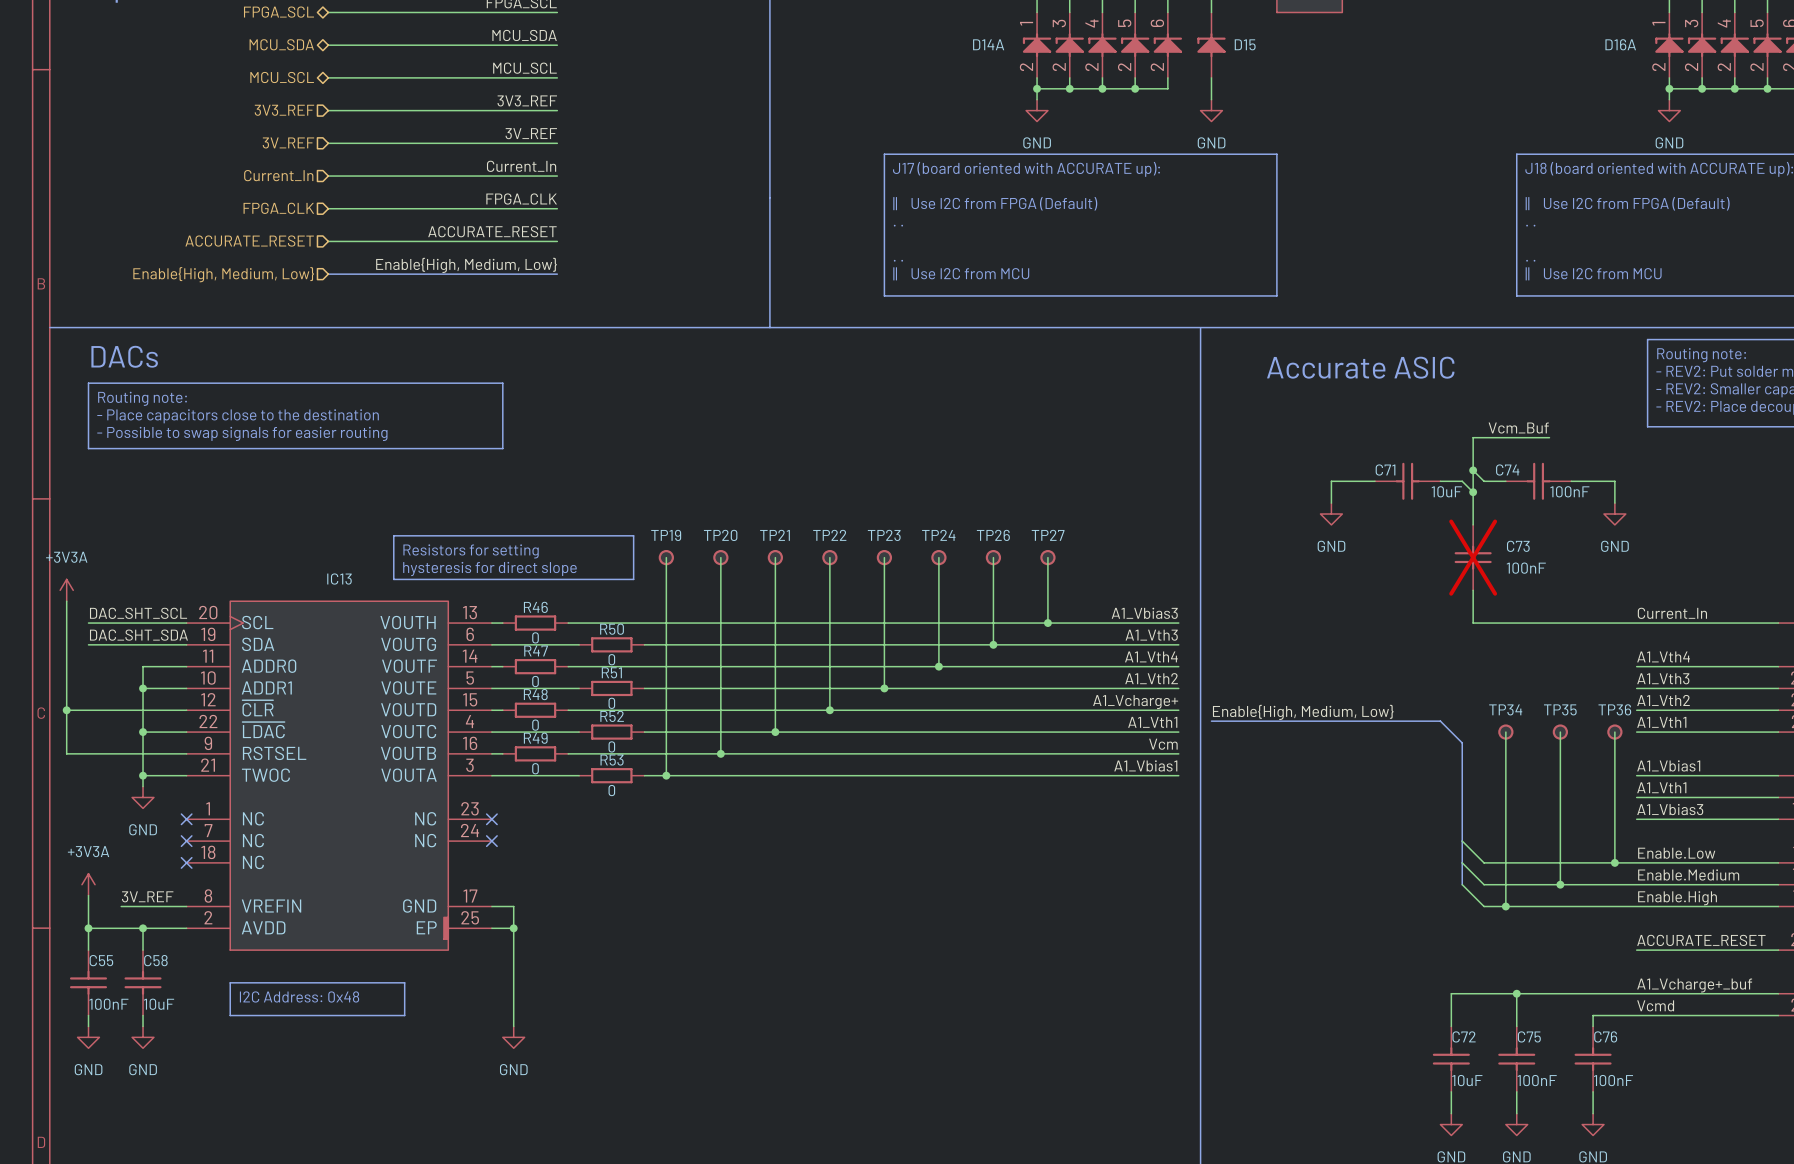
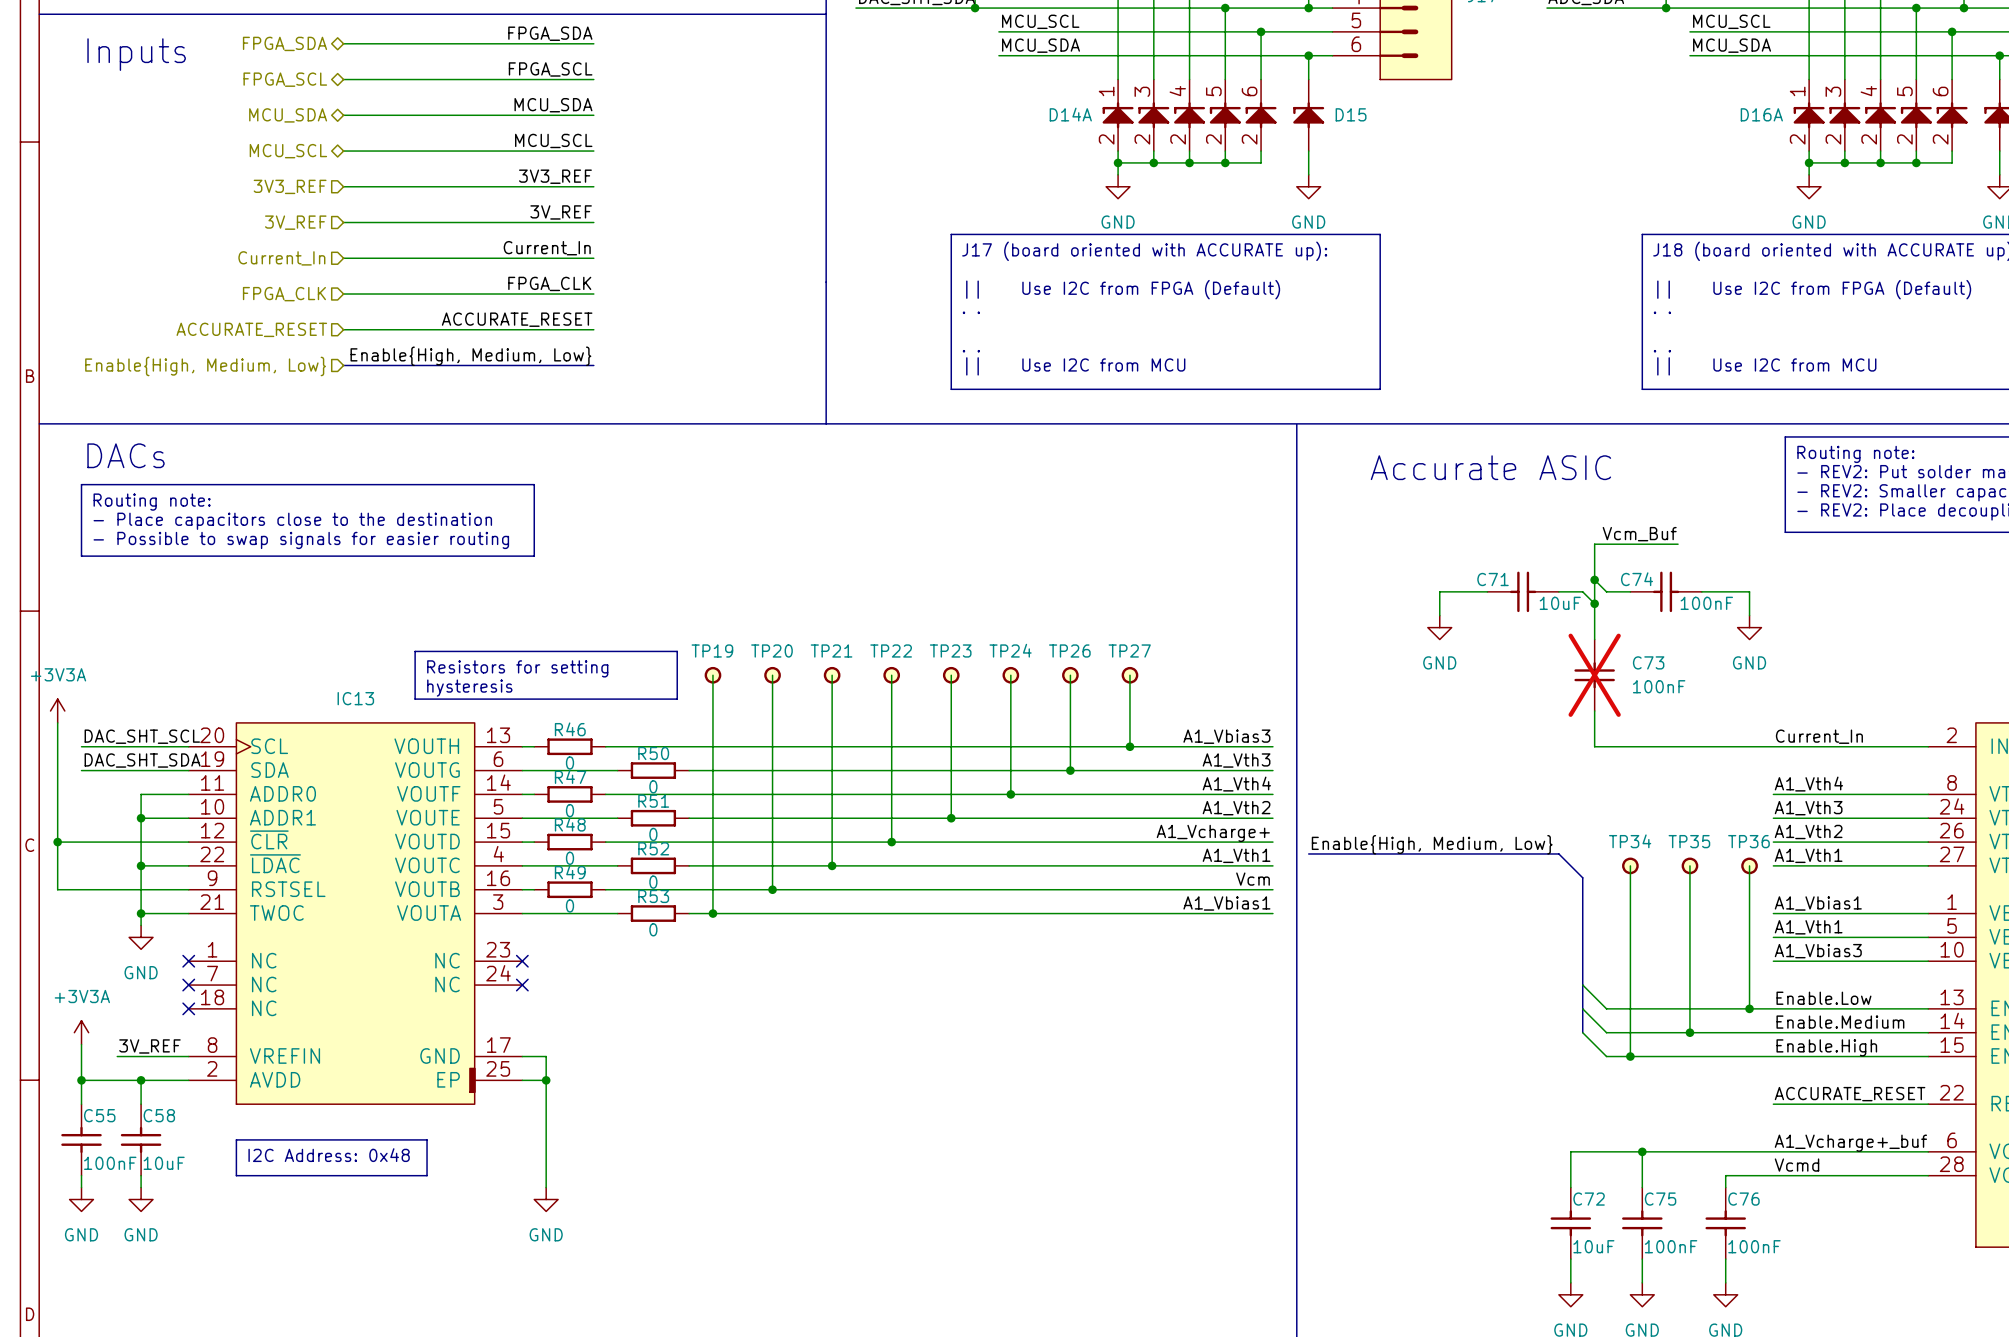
text: hysteresis for direct slope (489, 569) -> hysteresis (469, 688)

